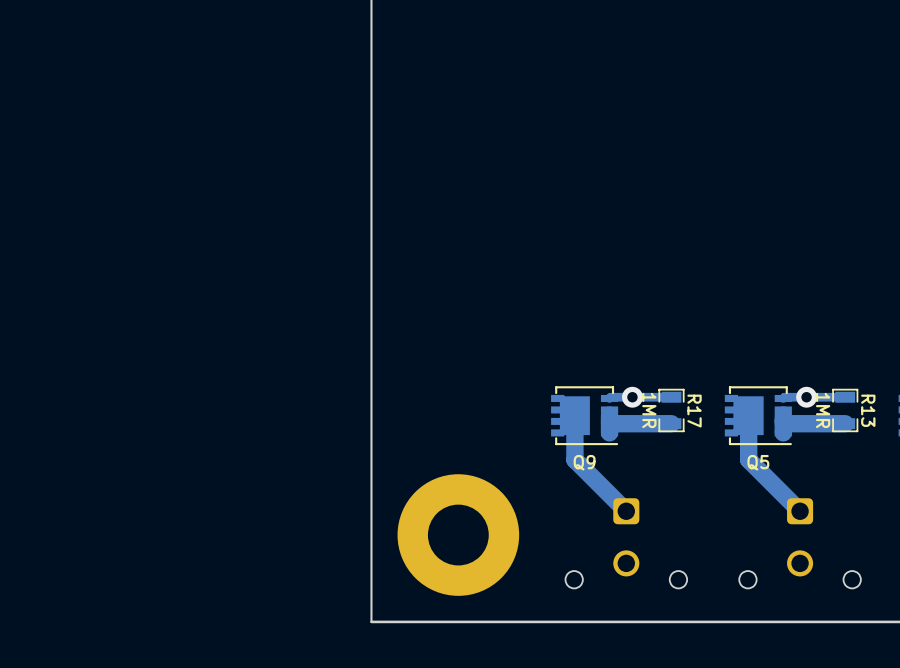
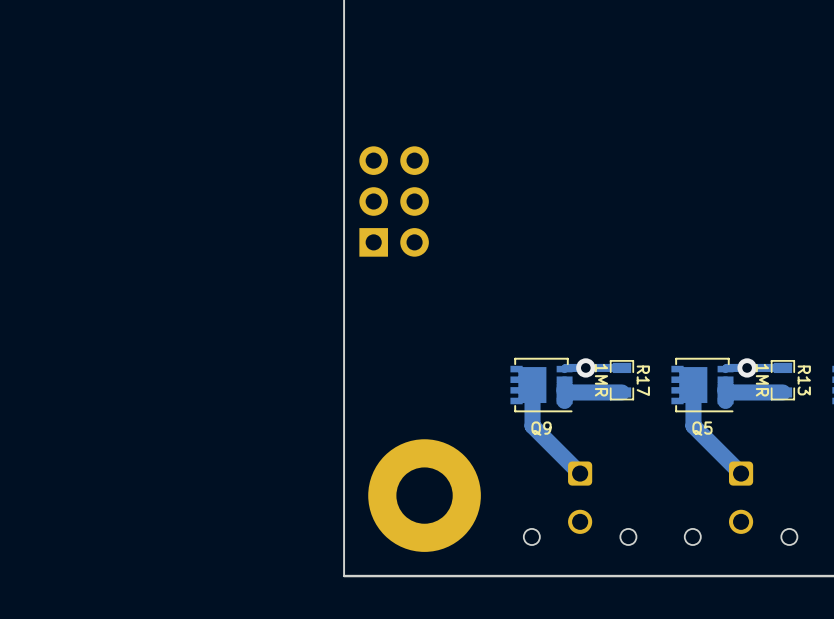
part: none -> (394, 201)

